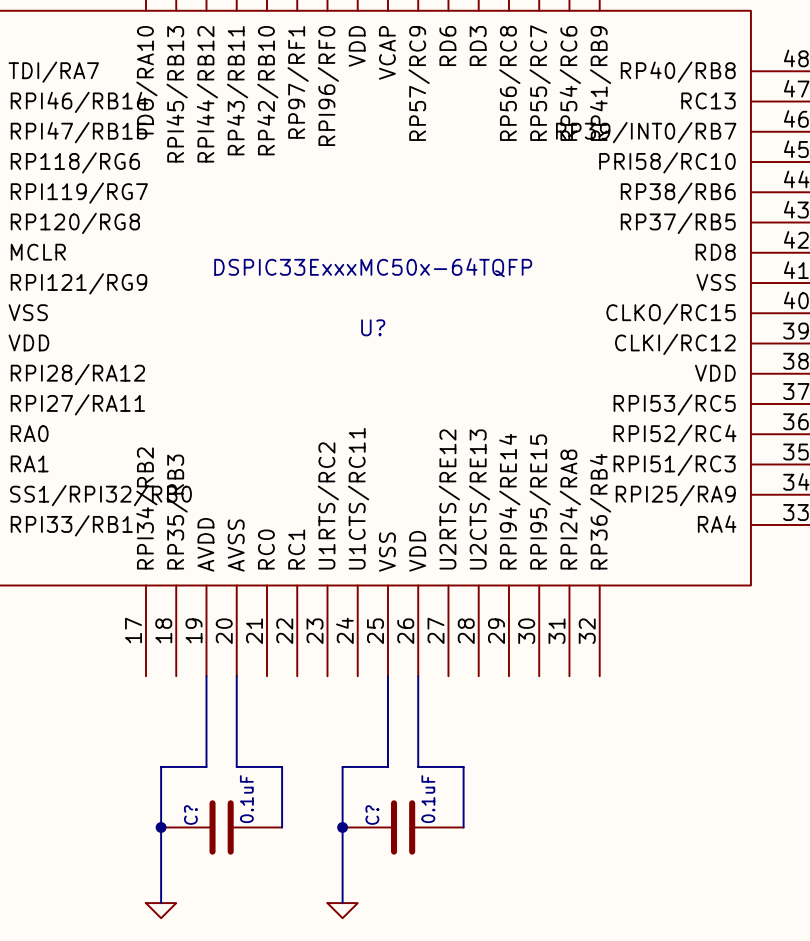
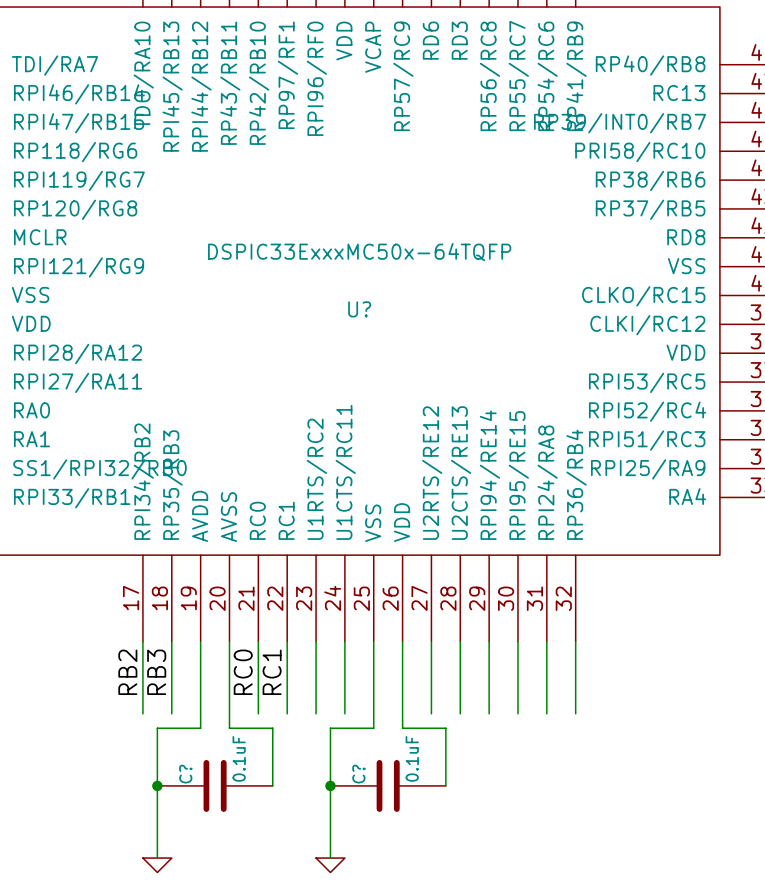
wire: none -> (142, 641) (142, 713)
wire: none -> (171, 641) (171, 713)
wire: none -> (258, 641) (258, 713)
wire: none -> (287, 641) (287, 713)
wire: none -> (316, 641) (316, 713)
wire: none -> (344, 641) (344, 713)
wire: none -> (431, 641) (431, 713)
wire: none -> (460, 641) (460, 713)
wire: none -> (489, 641) (489, 713)
wire: none -> (517, 641) (517, 713)
wire: none -> (546, 641) (546, 713)
wire: none -> (575, 641) (575, 713)
label: none -> RB2 (127, 672)
label: none -> RB3 (156, 672)
label: none -> RC0 (243, 672)
label: none -> RC1 (272, 672)

